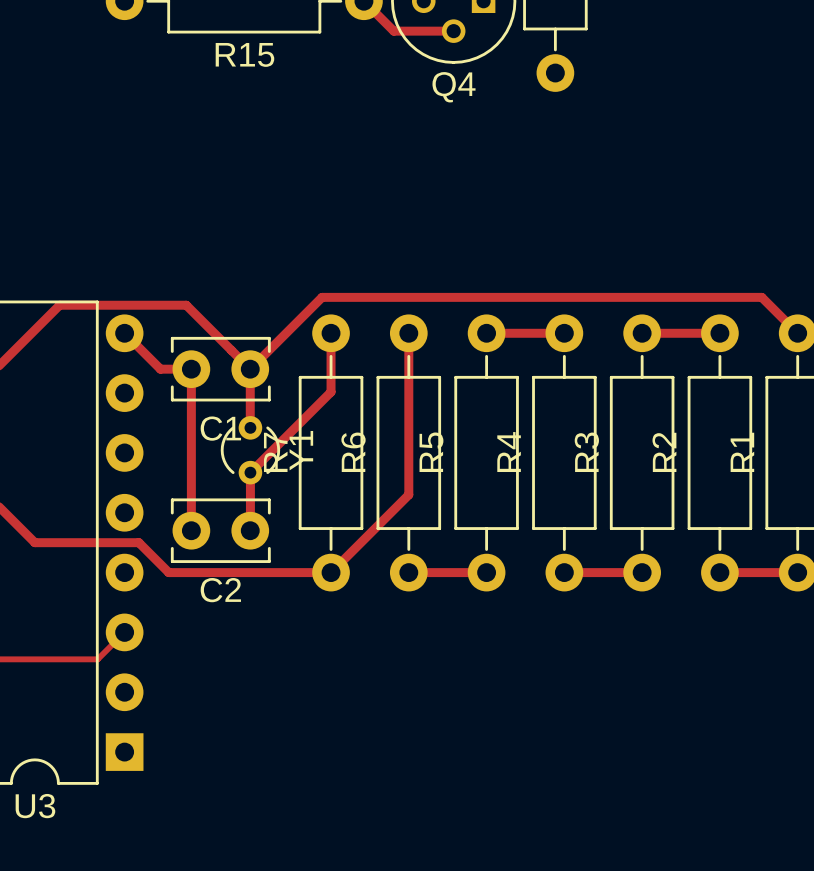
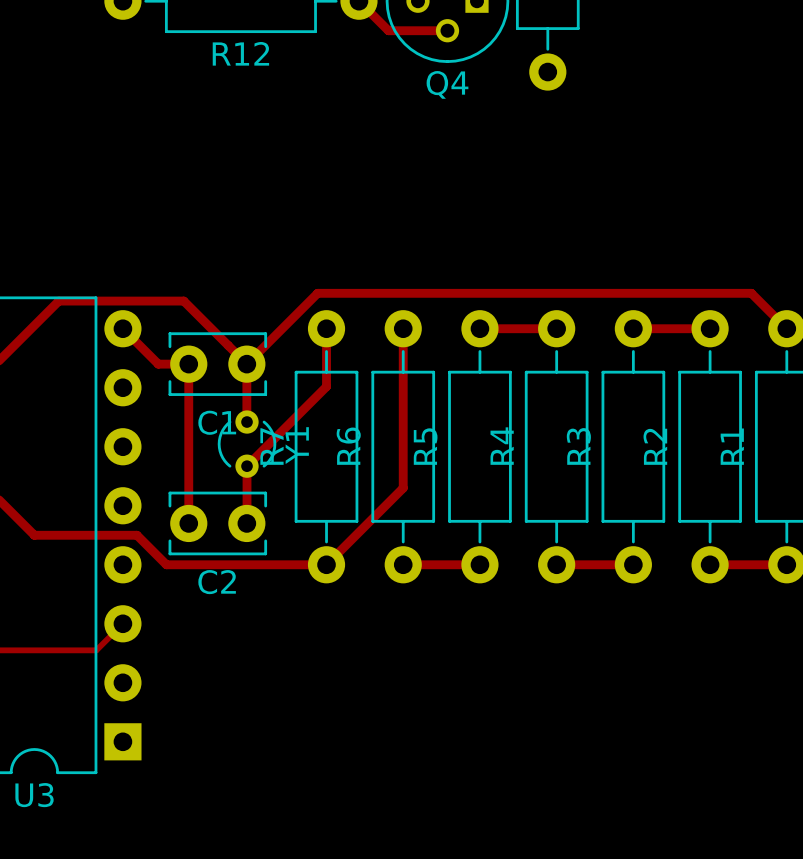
R15 name: R15 (244, 54) -> R12 (240, 53)

